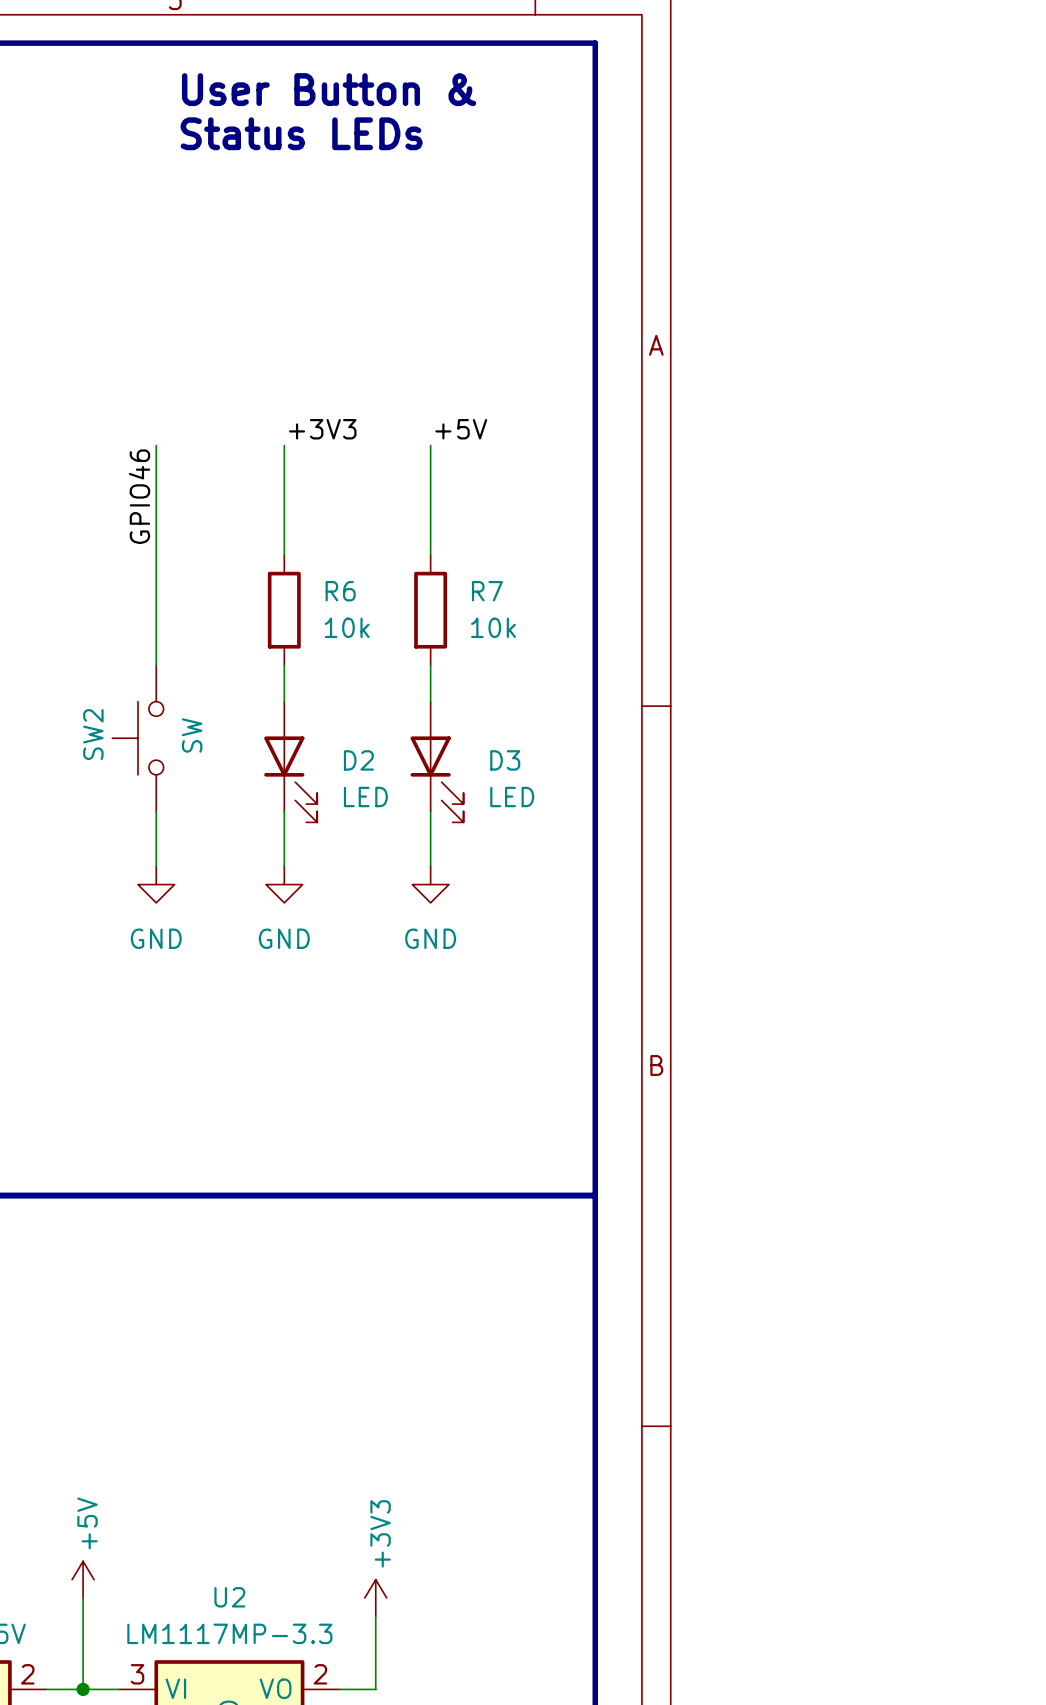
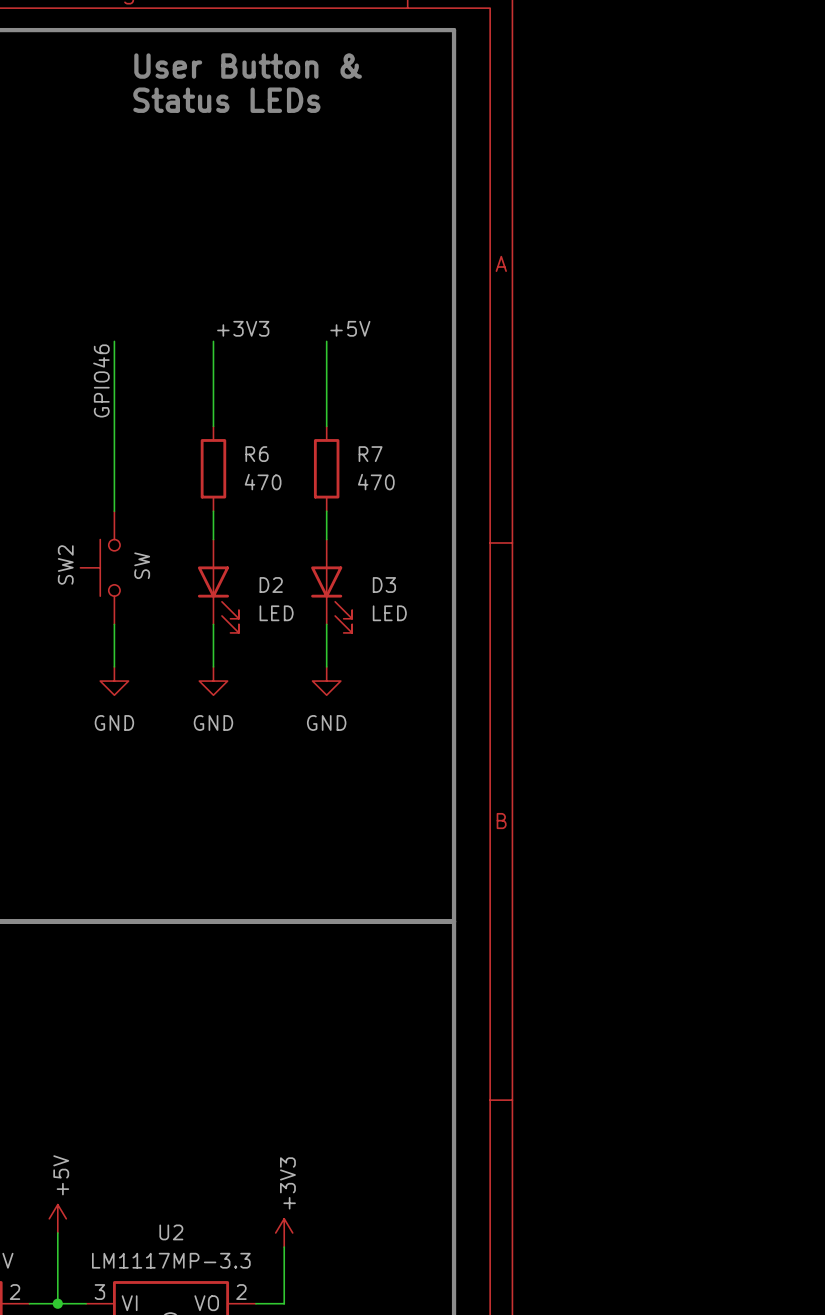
R6 value: 10k (347, 627) -> 470 (263, 482)
R7 value: 10k (493, 627) -> 470 (376, 482)

